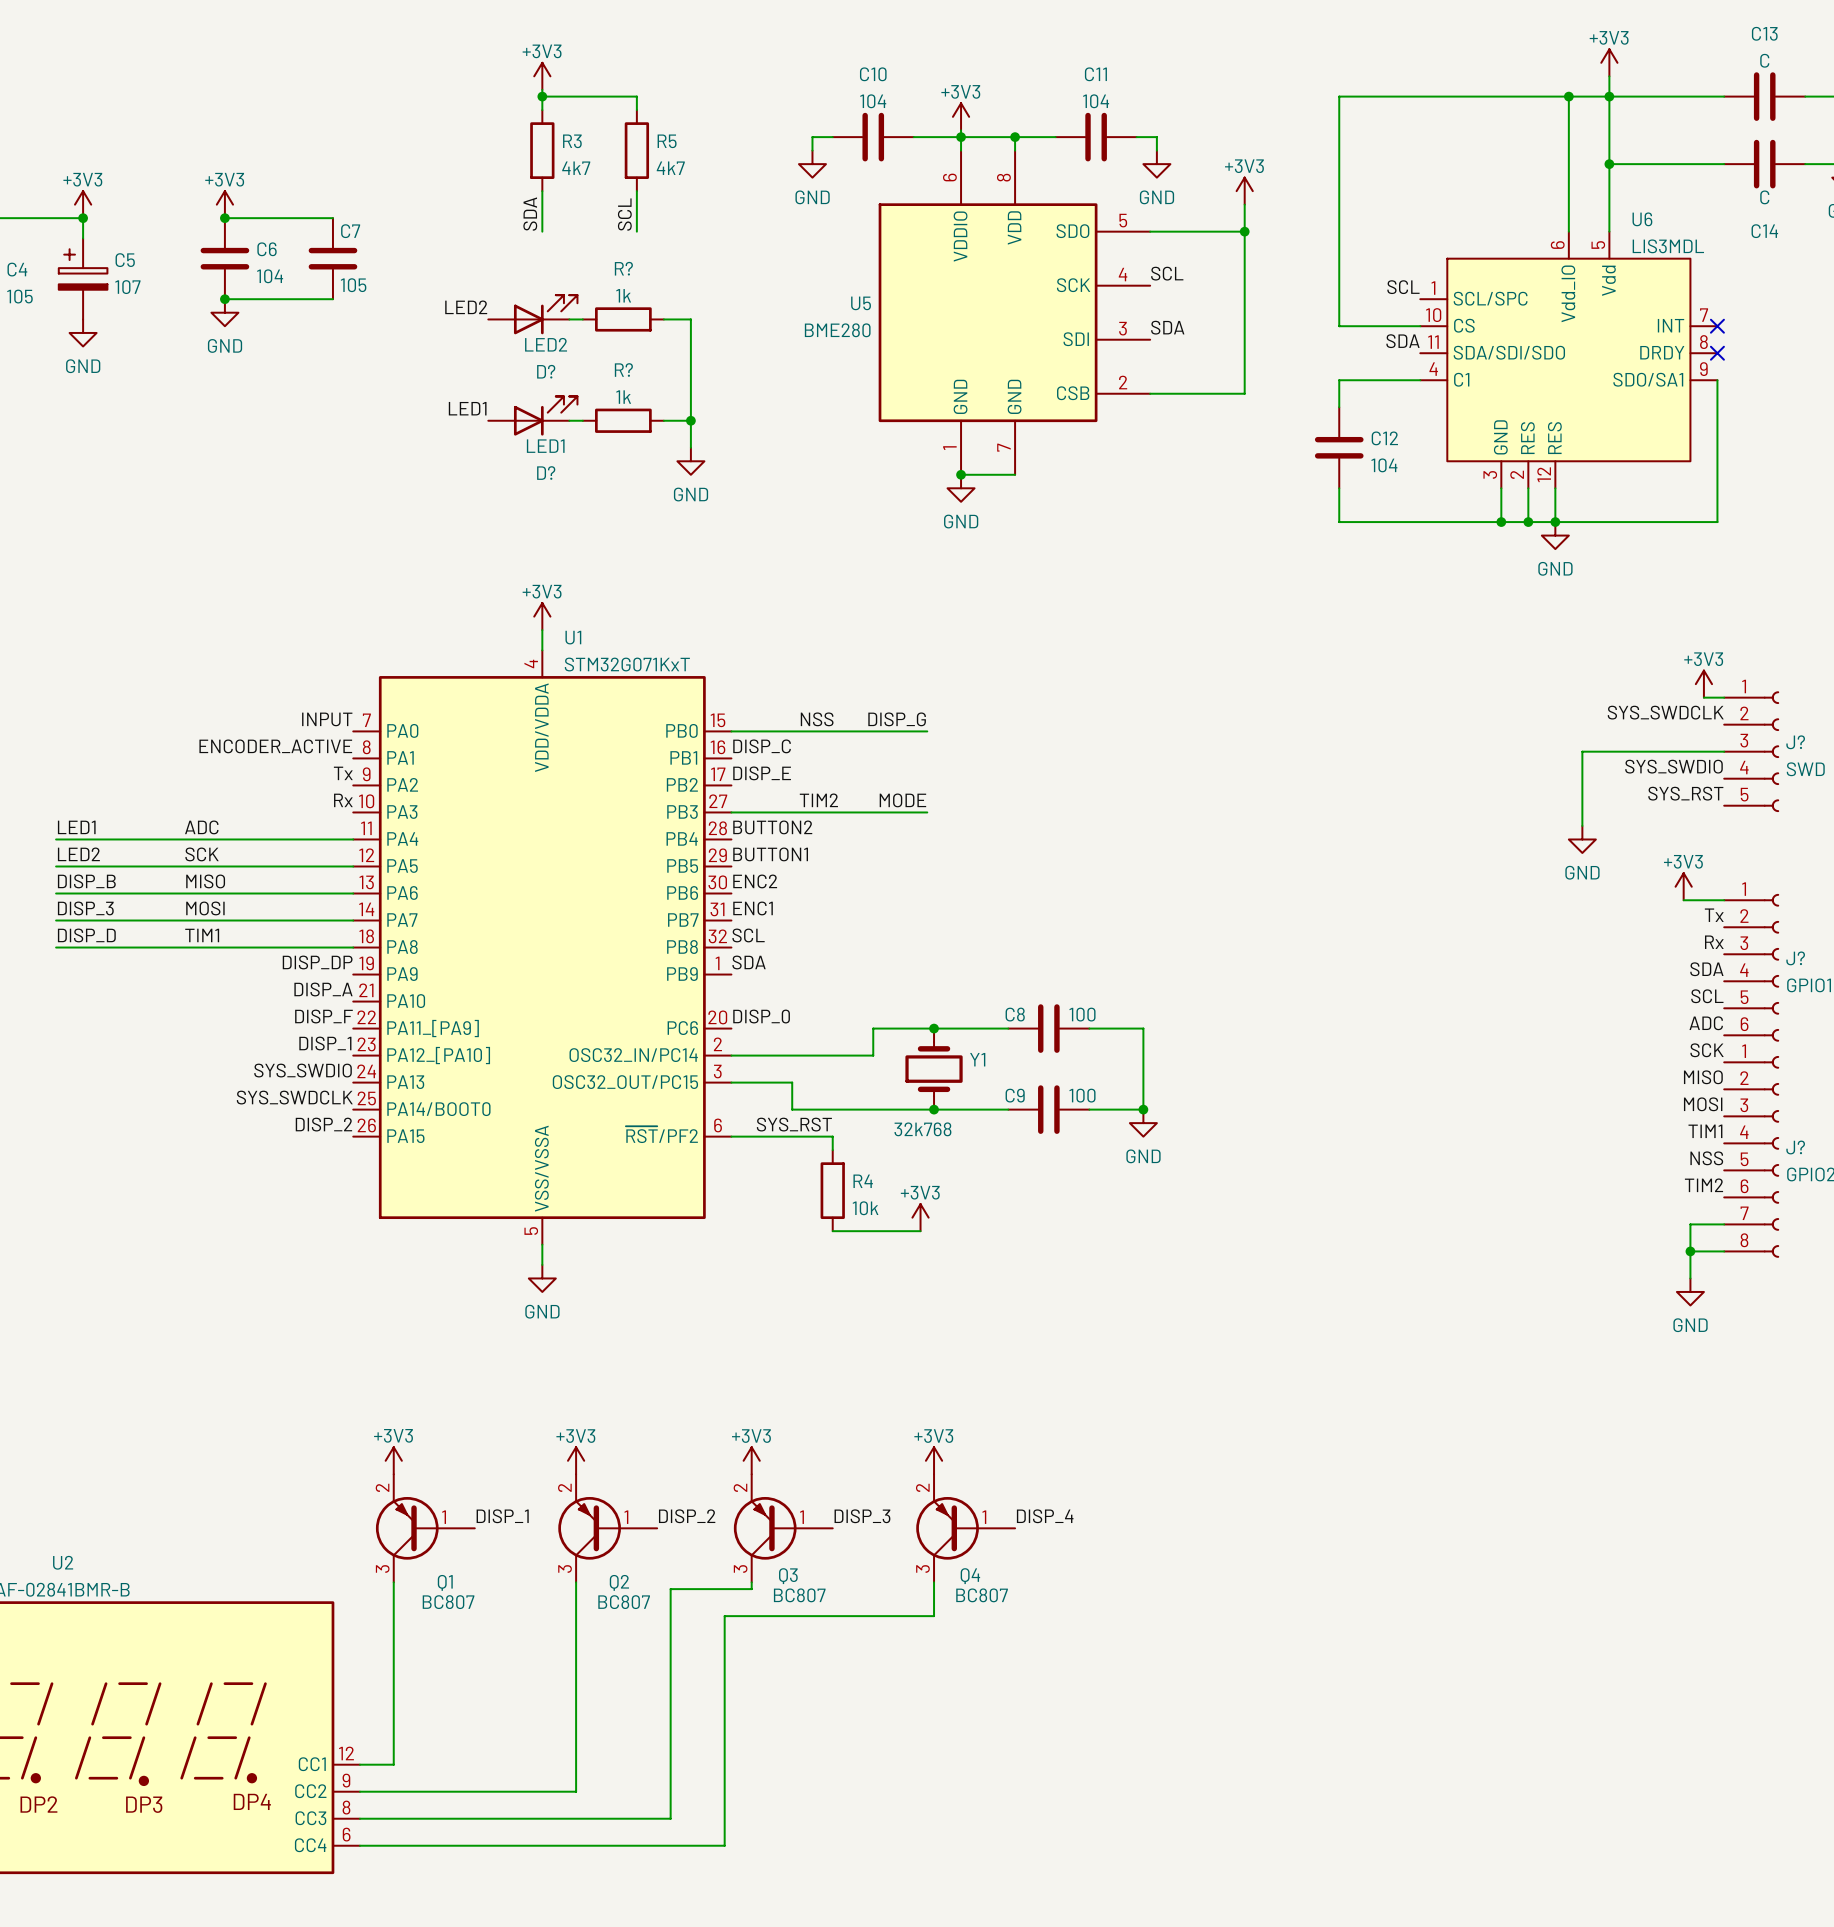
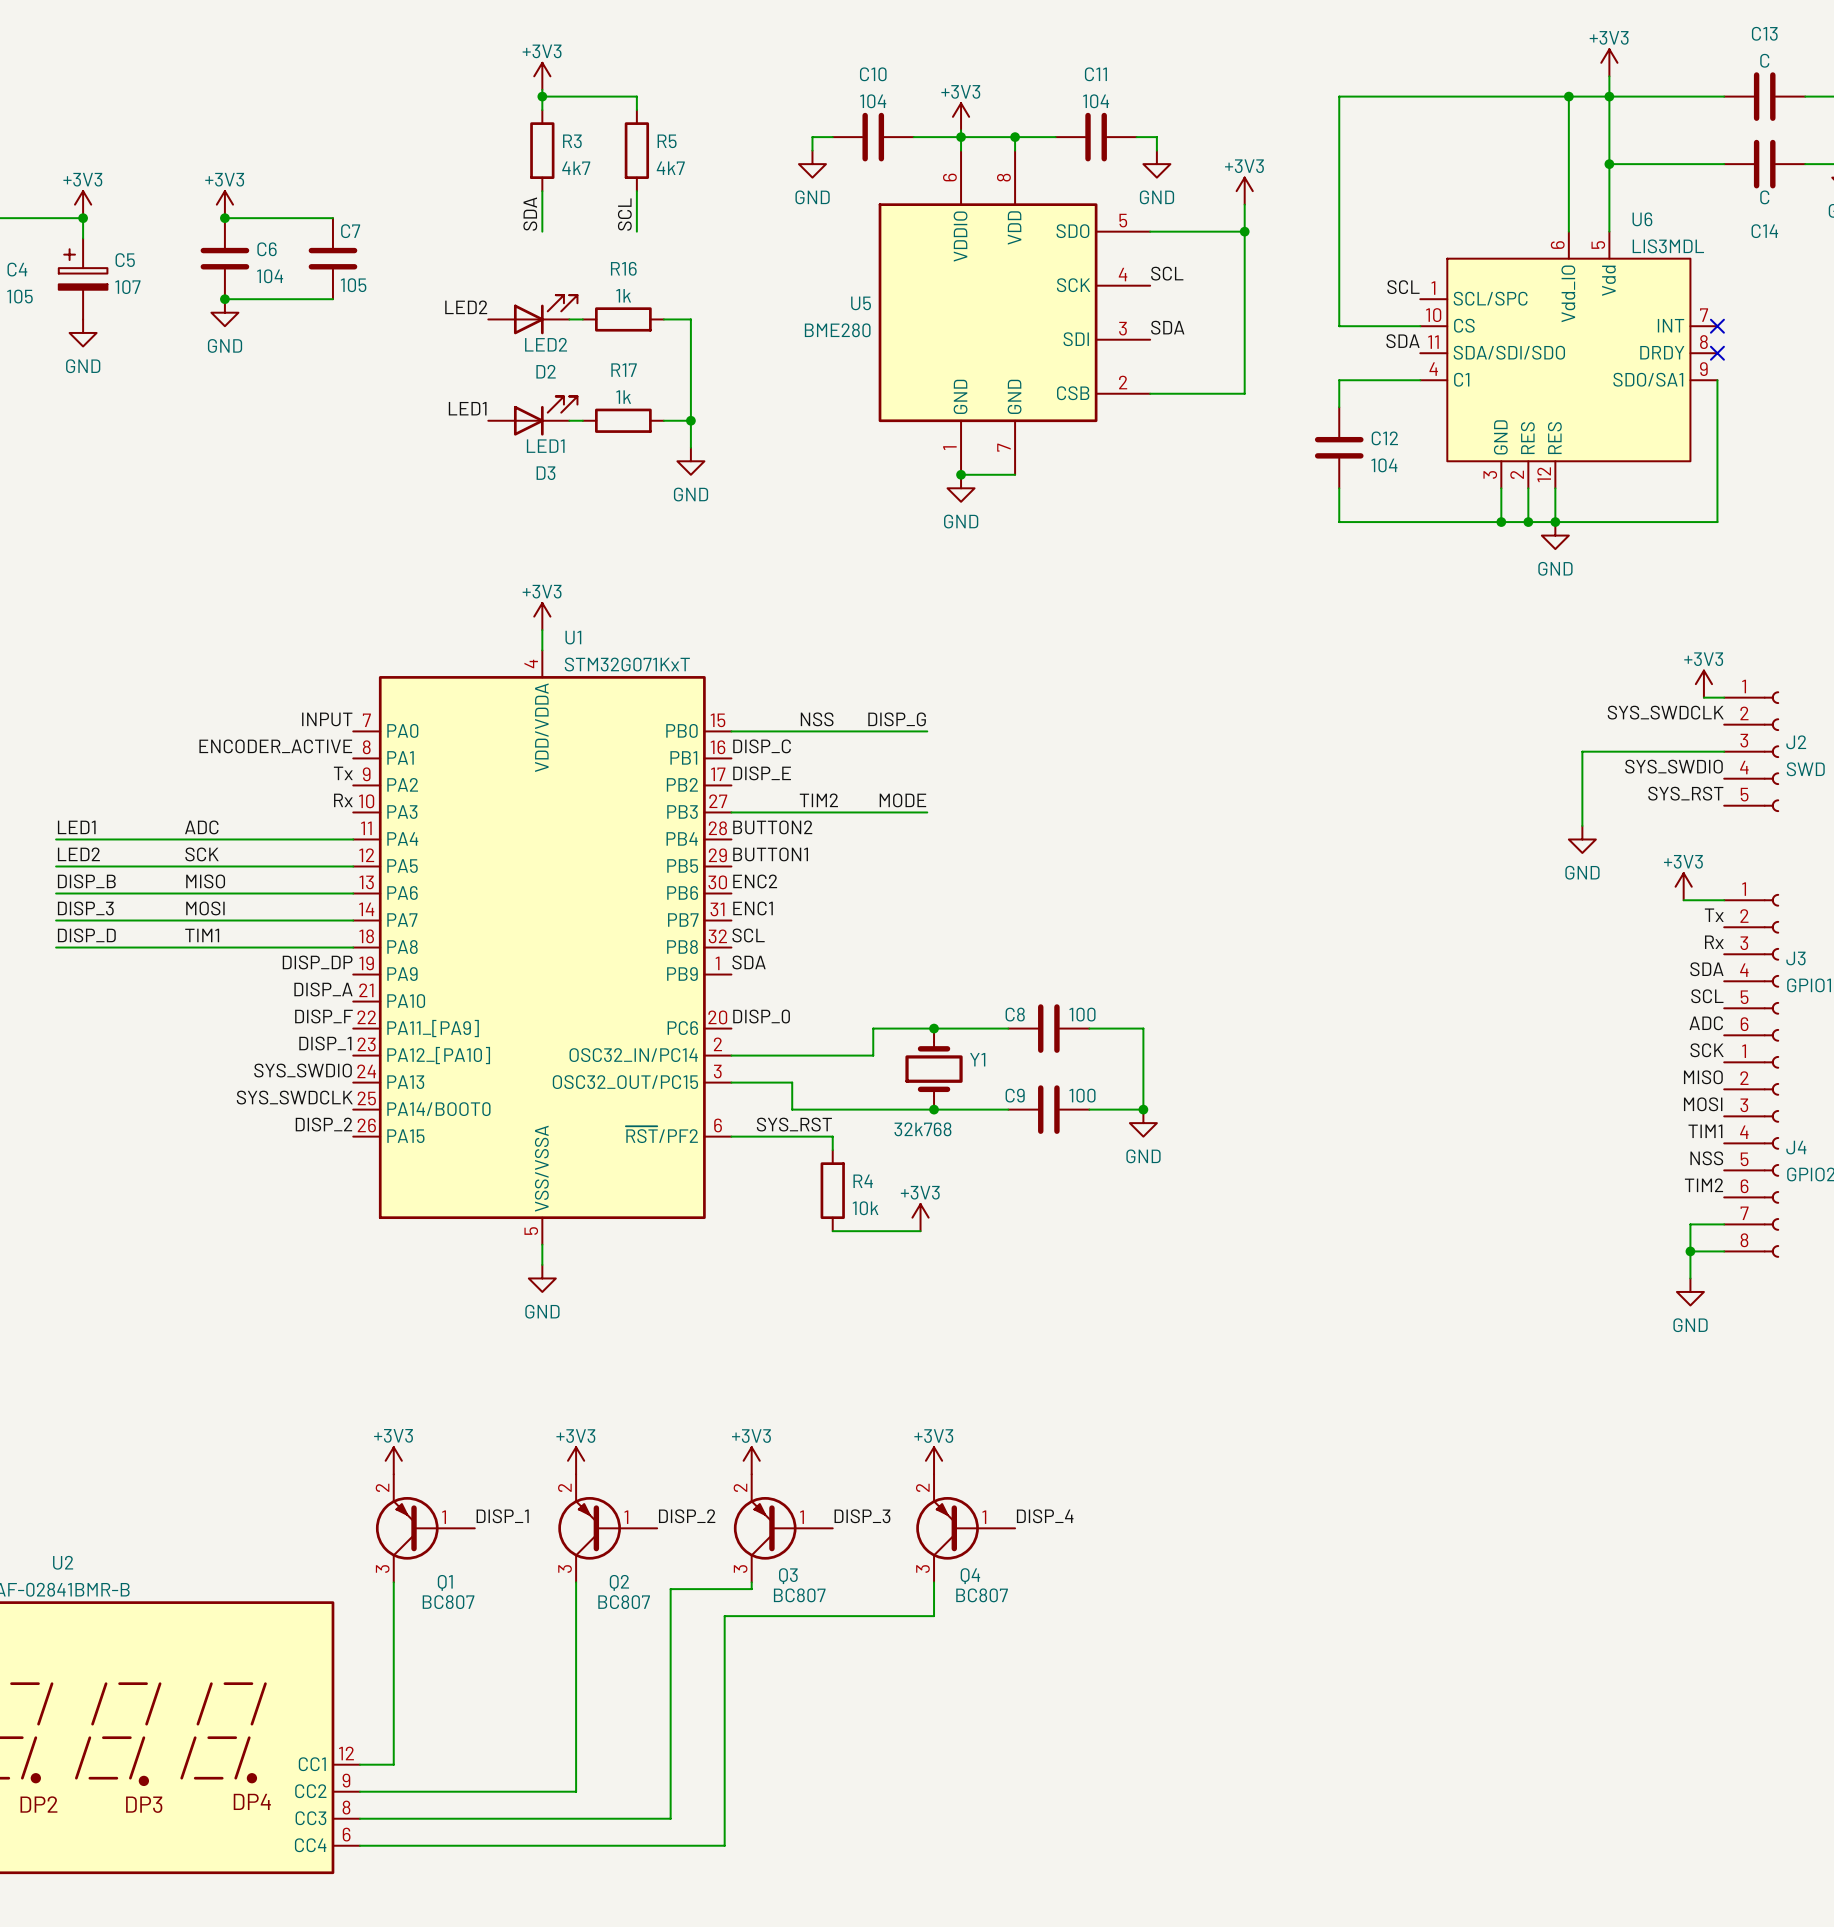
R? name: R? (623, 268) -> R16 (623, 268)
R? name: R? (623, 370) -> R17 (624, 370)
D? name: D? (546, 371) -> D2 (546, 371)
D? name: D? (546, 473) -> D3 (545, 473)
J? name: J? (1795, 742) -> J2 (1796, 742)
J? name: J? (1795, 958) -> J3 (1795, 958)
J? name: J? (1795, 1147) -> J4 (1796, 1147)

